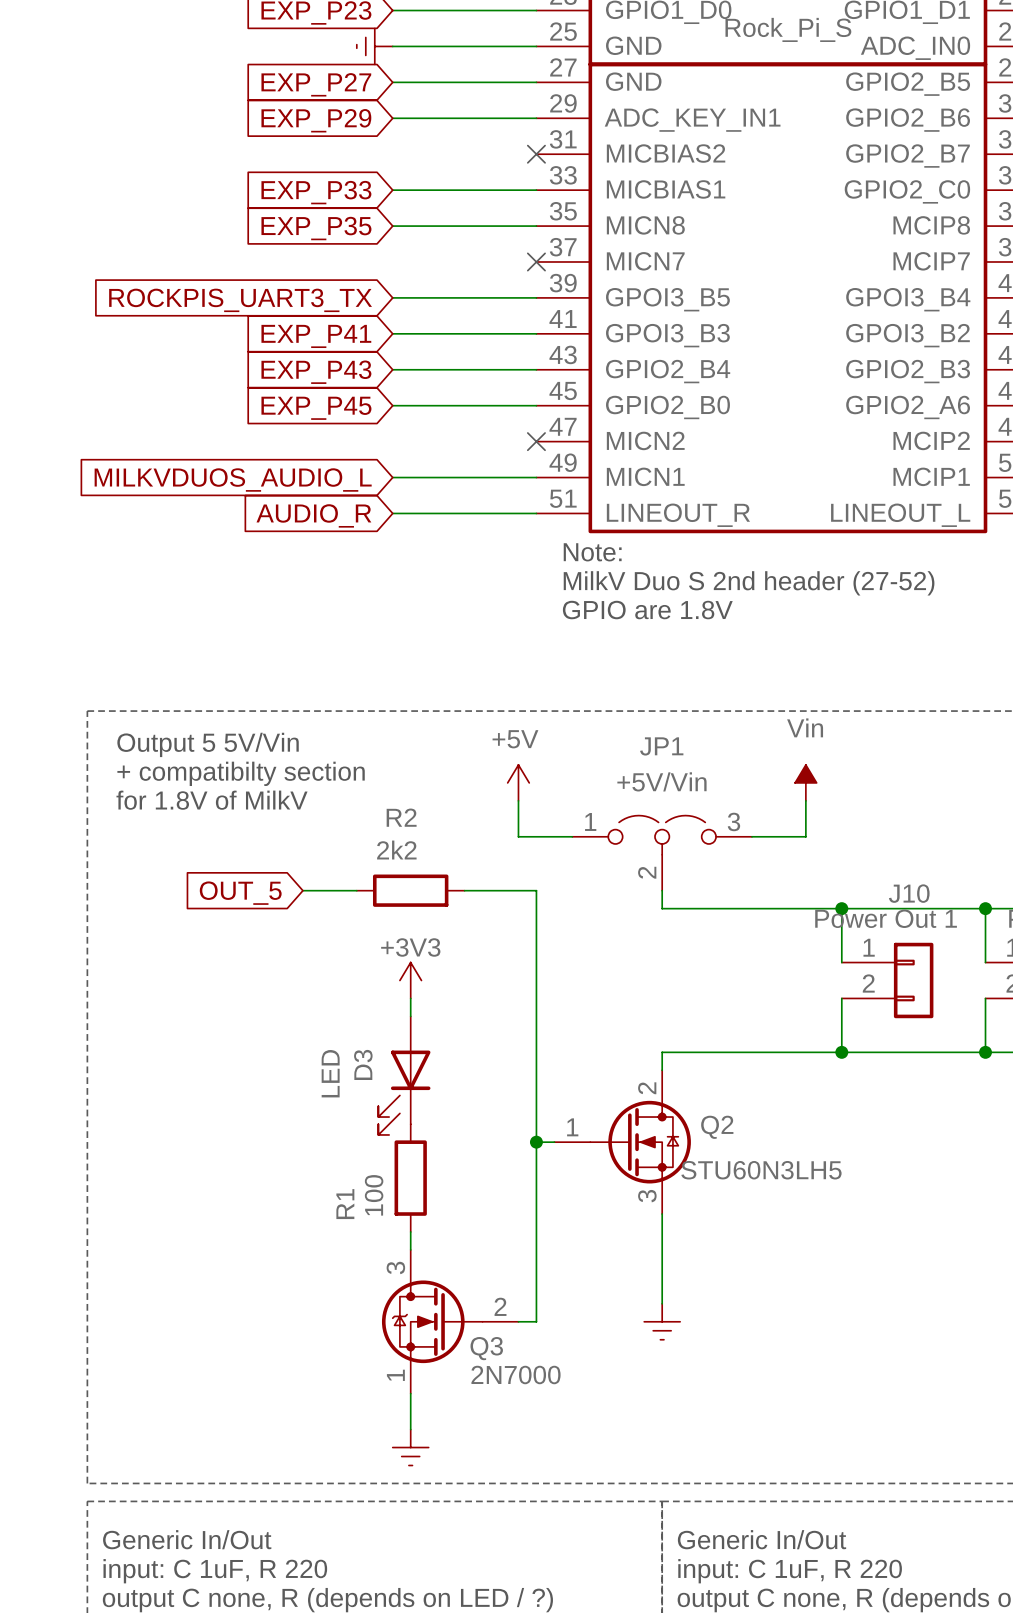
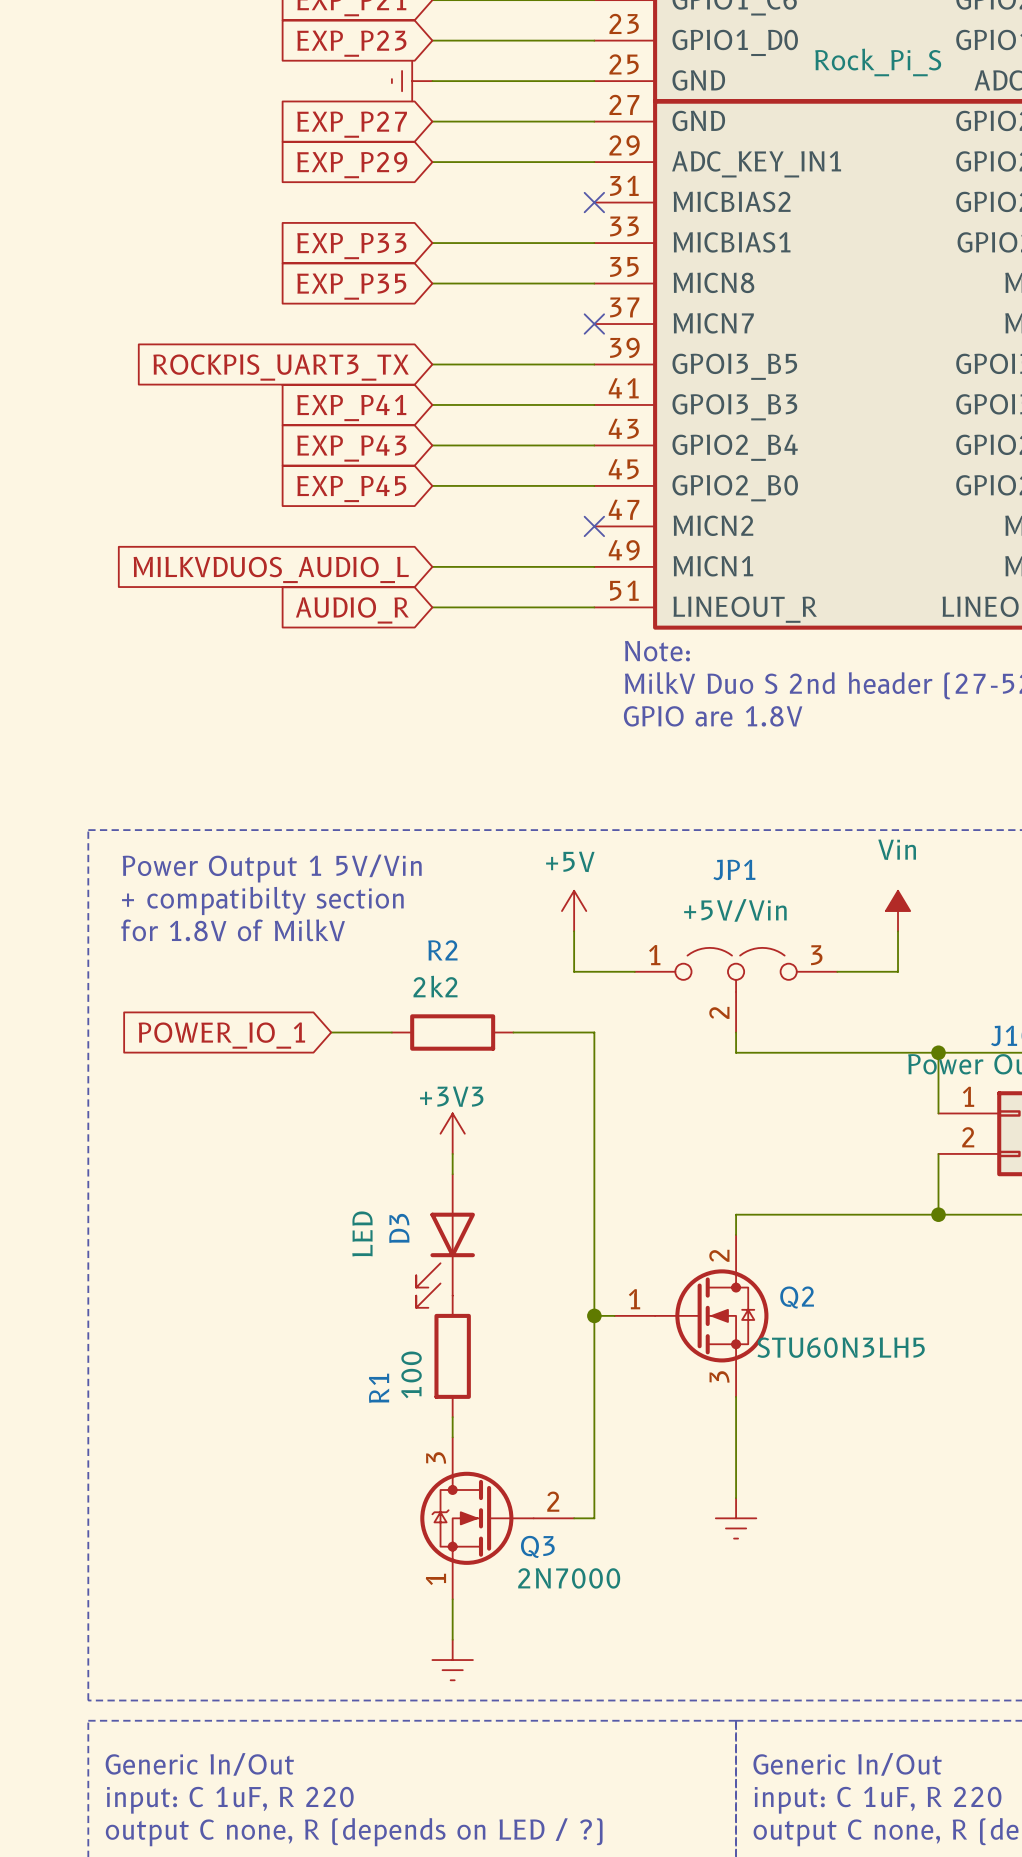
text: Output 5 5V/Vin (208, 744) -> Power Output 1 5V/Vin (272, 868)
global label: OUT_5 (240, 893) -> POWER_IO_1 (221, 1035)

